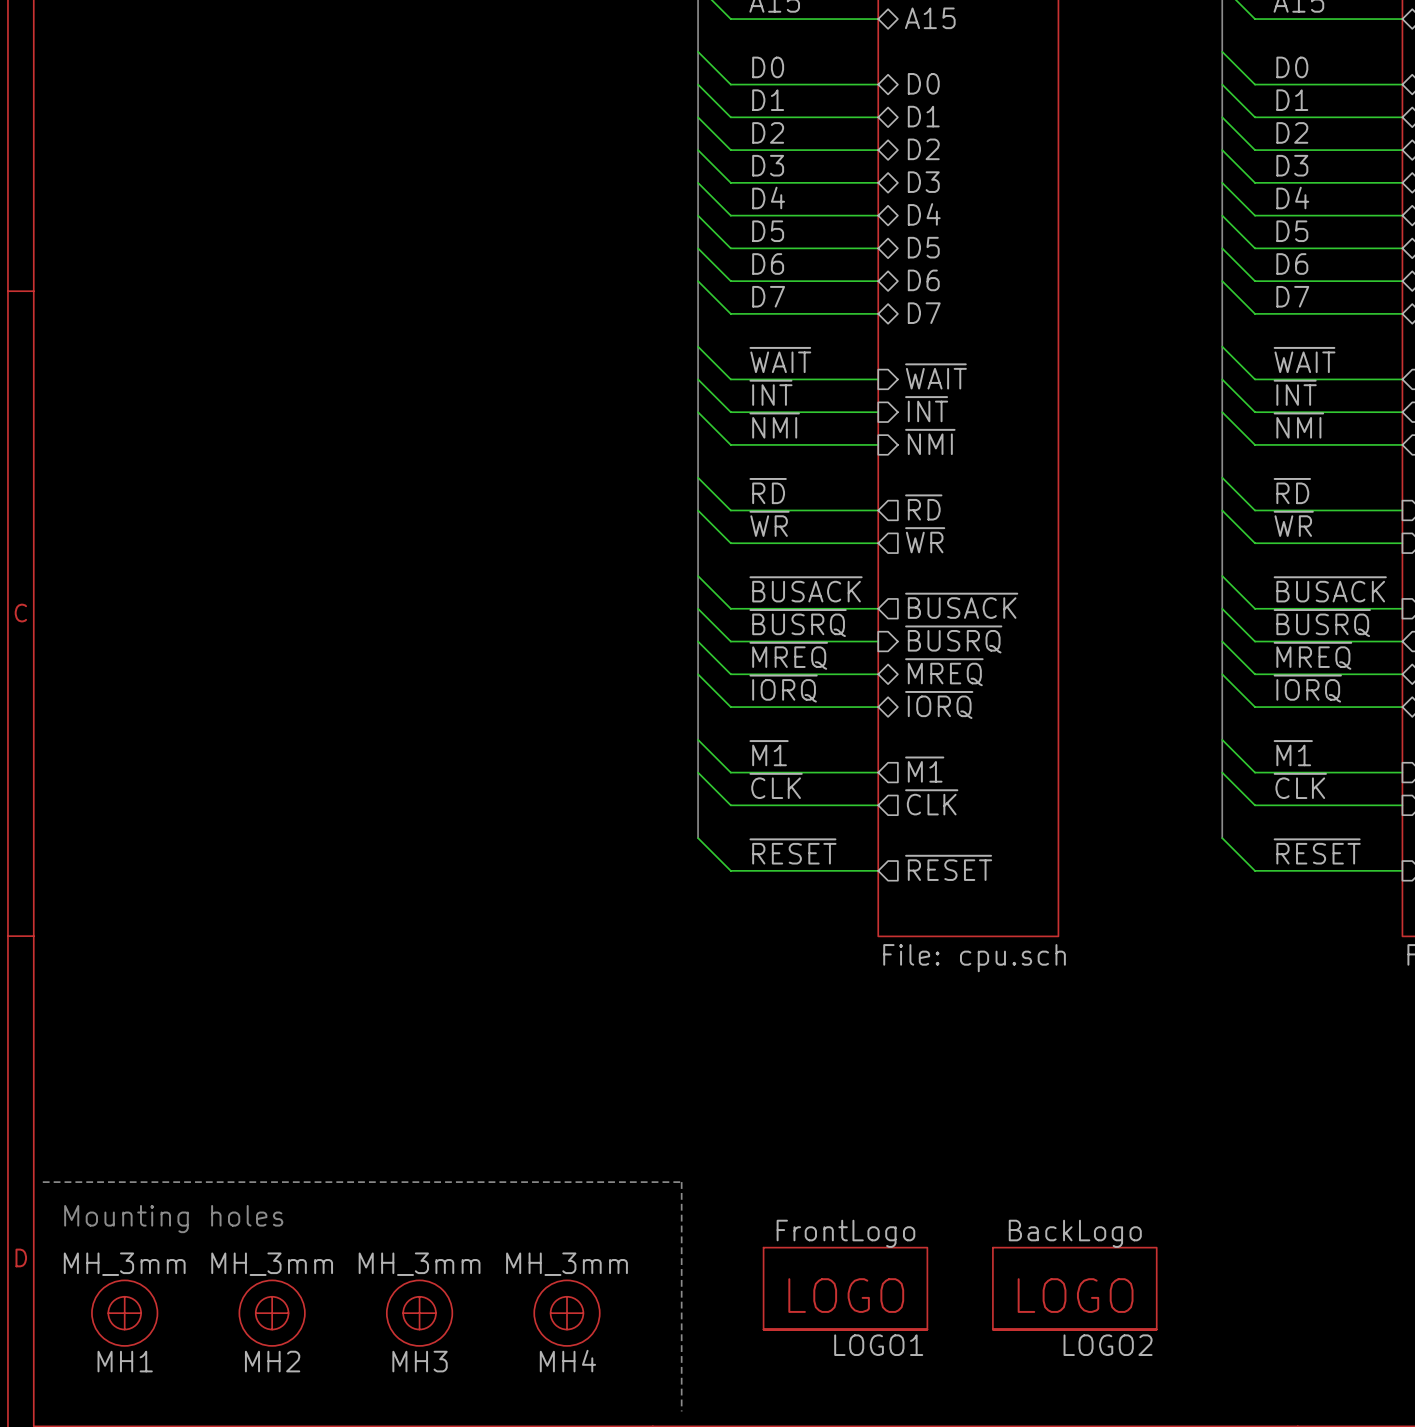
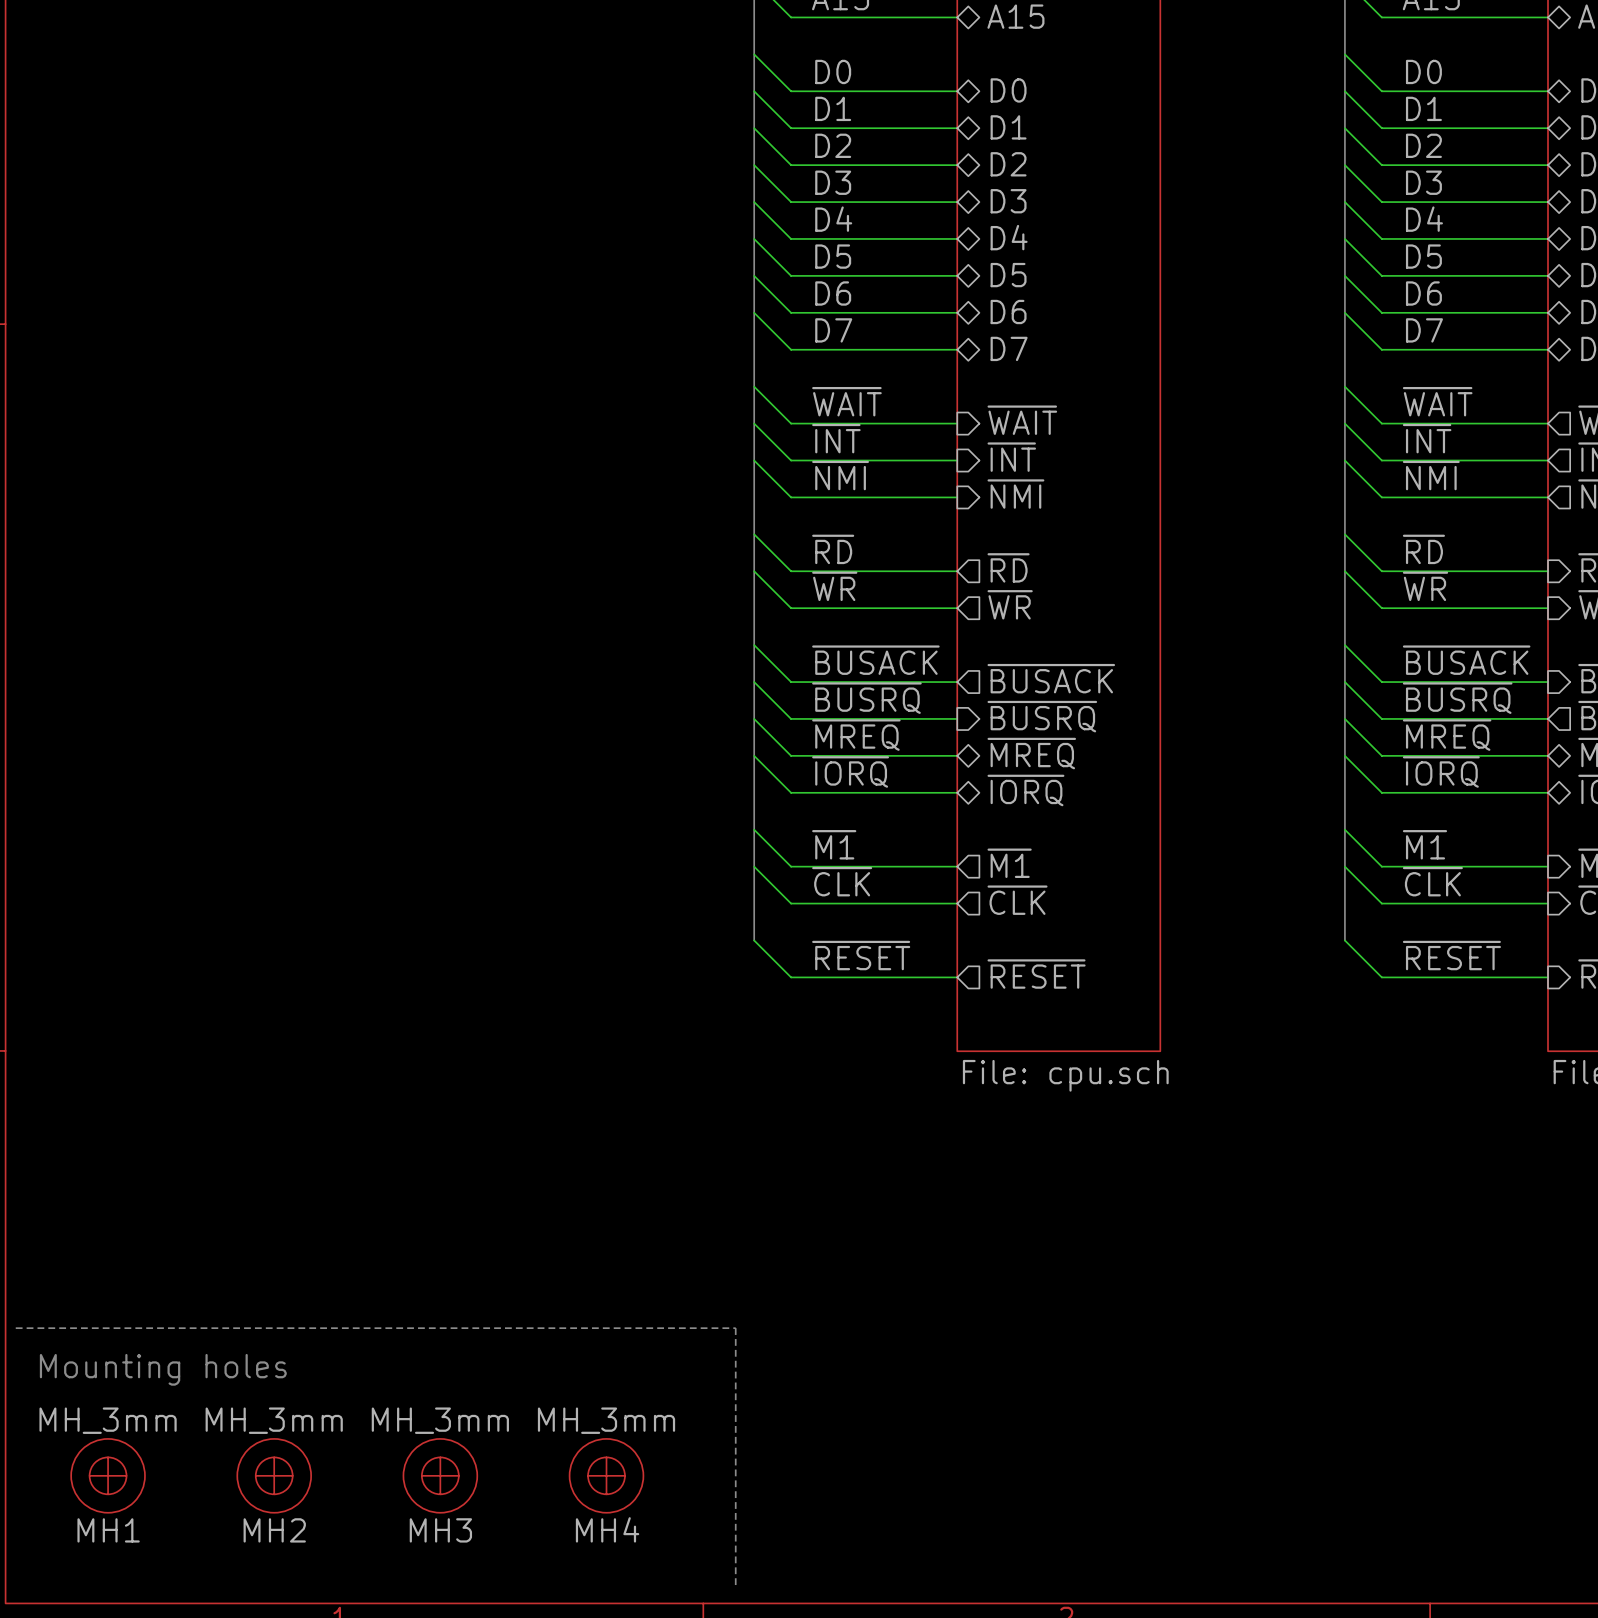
LOGO1: FrontLogo (845, 1288) -> none
LOGO2: BackLogo (1074, 1288) -> none

